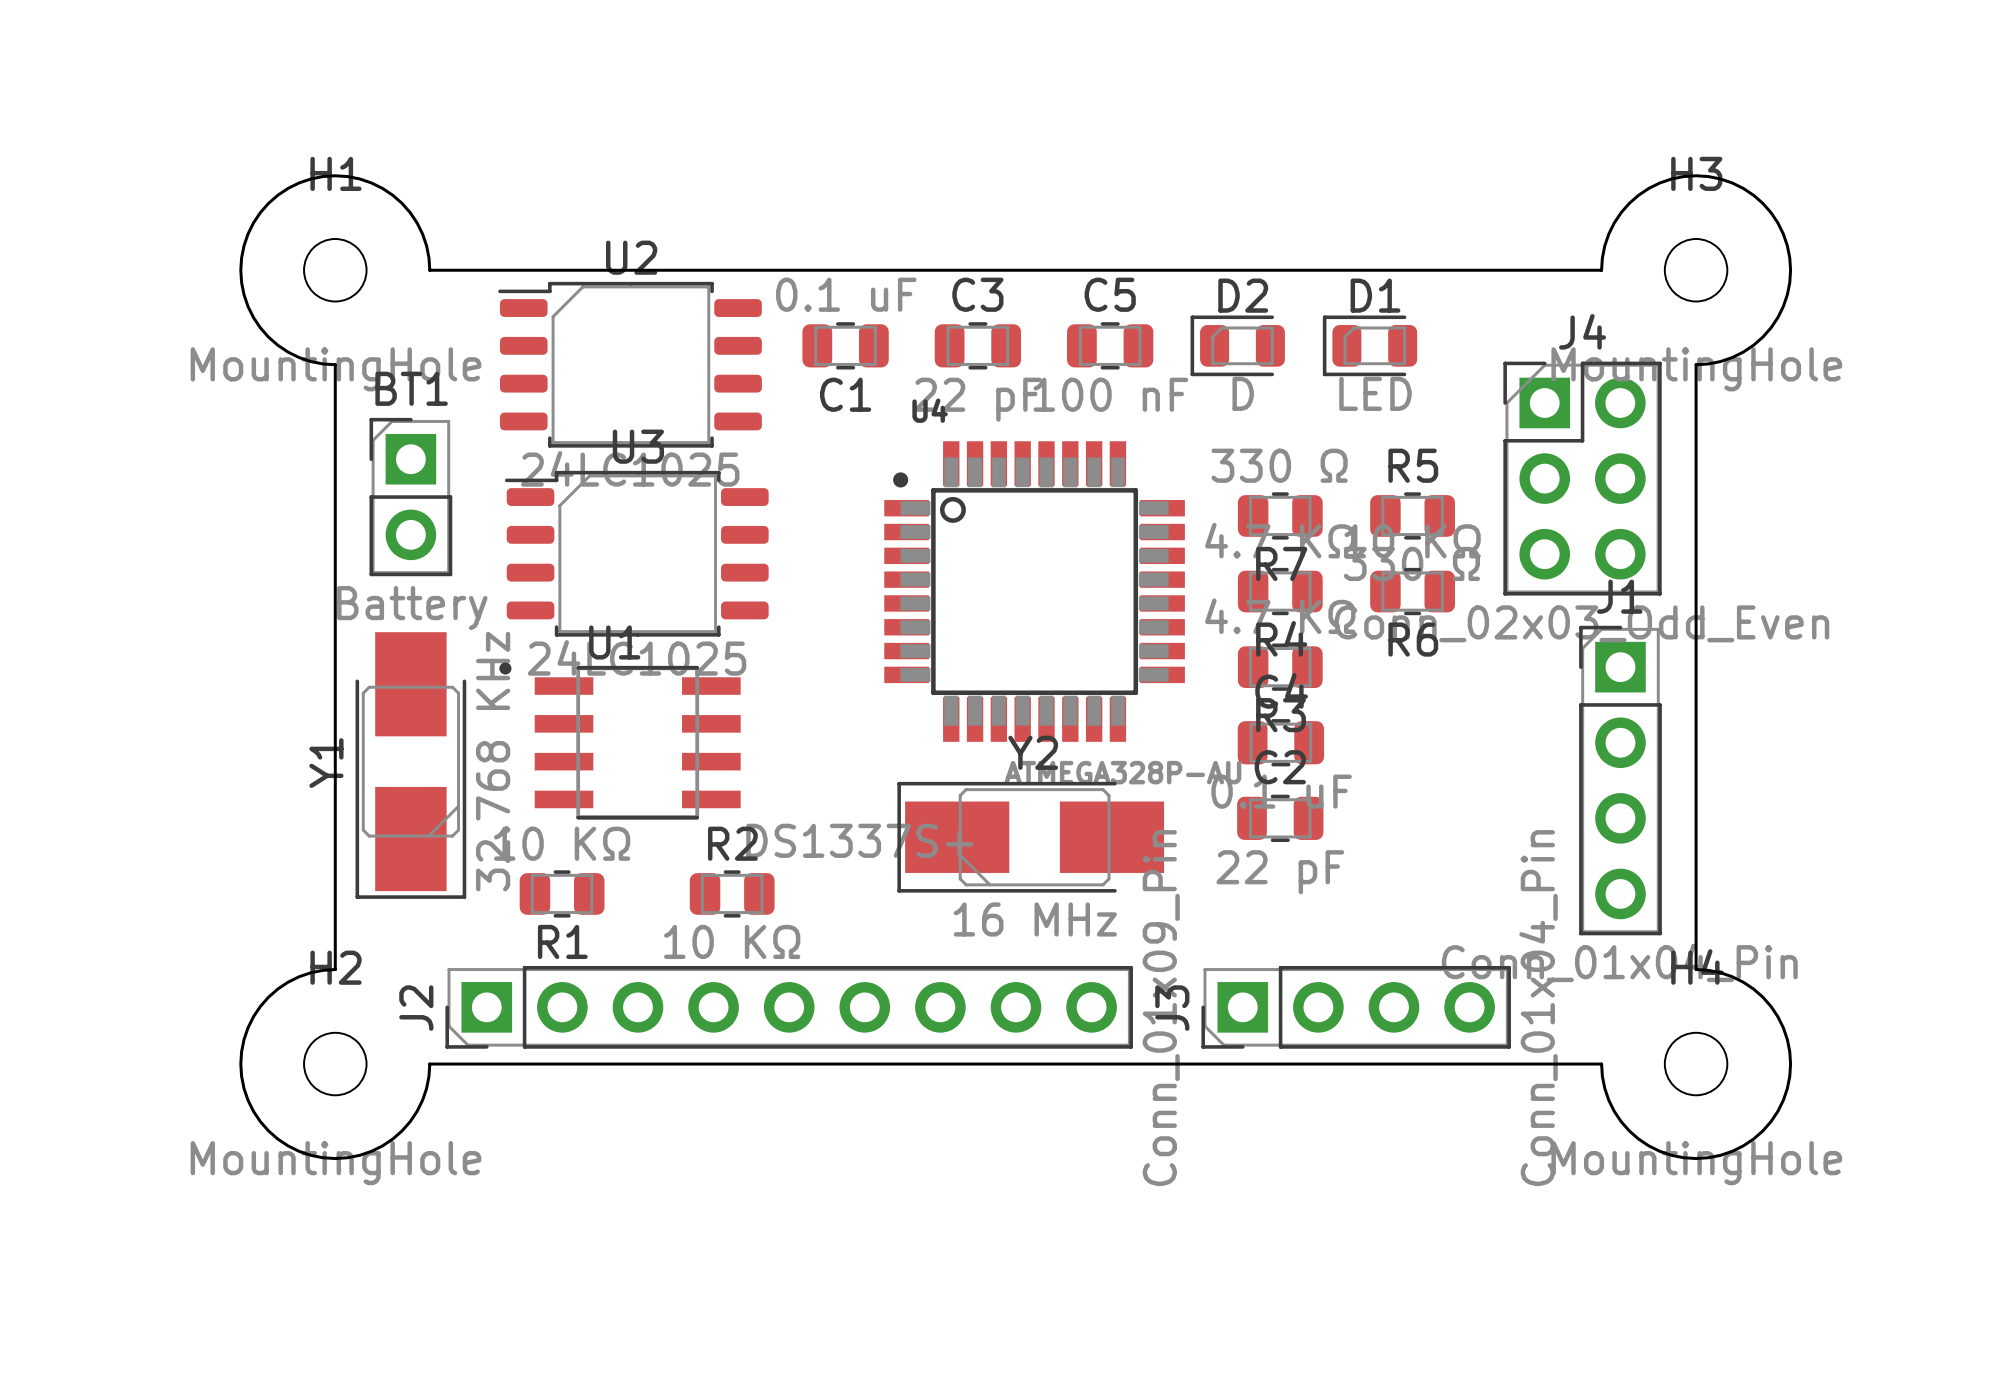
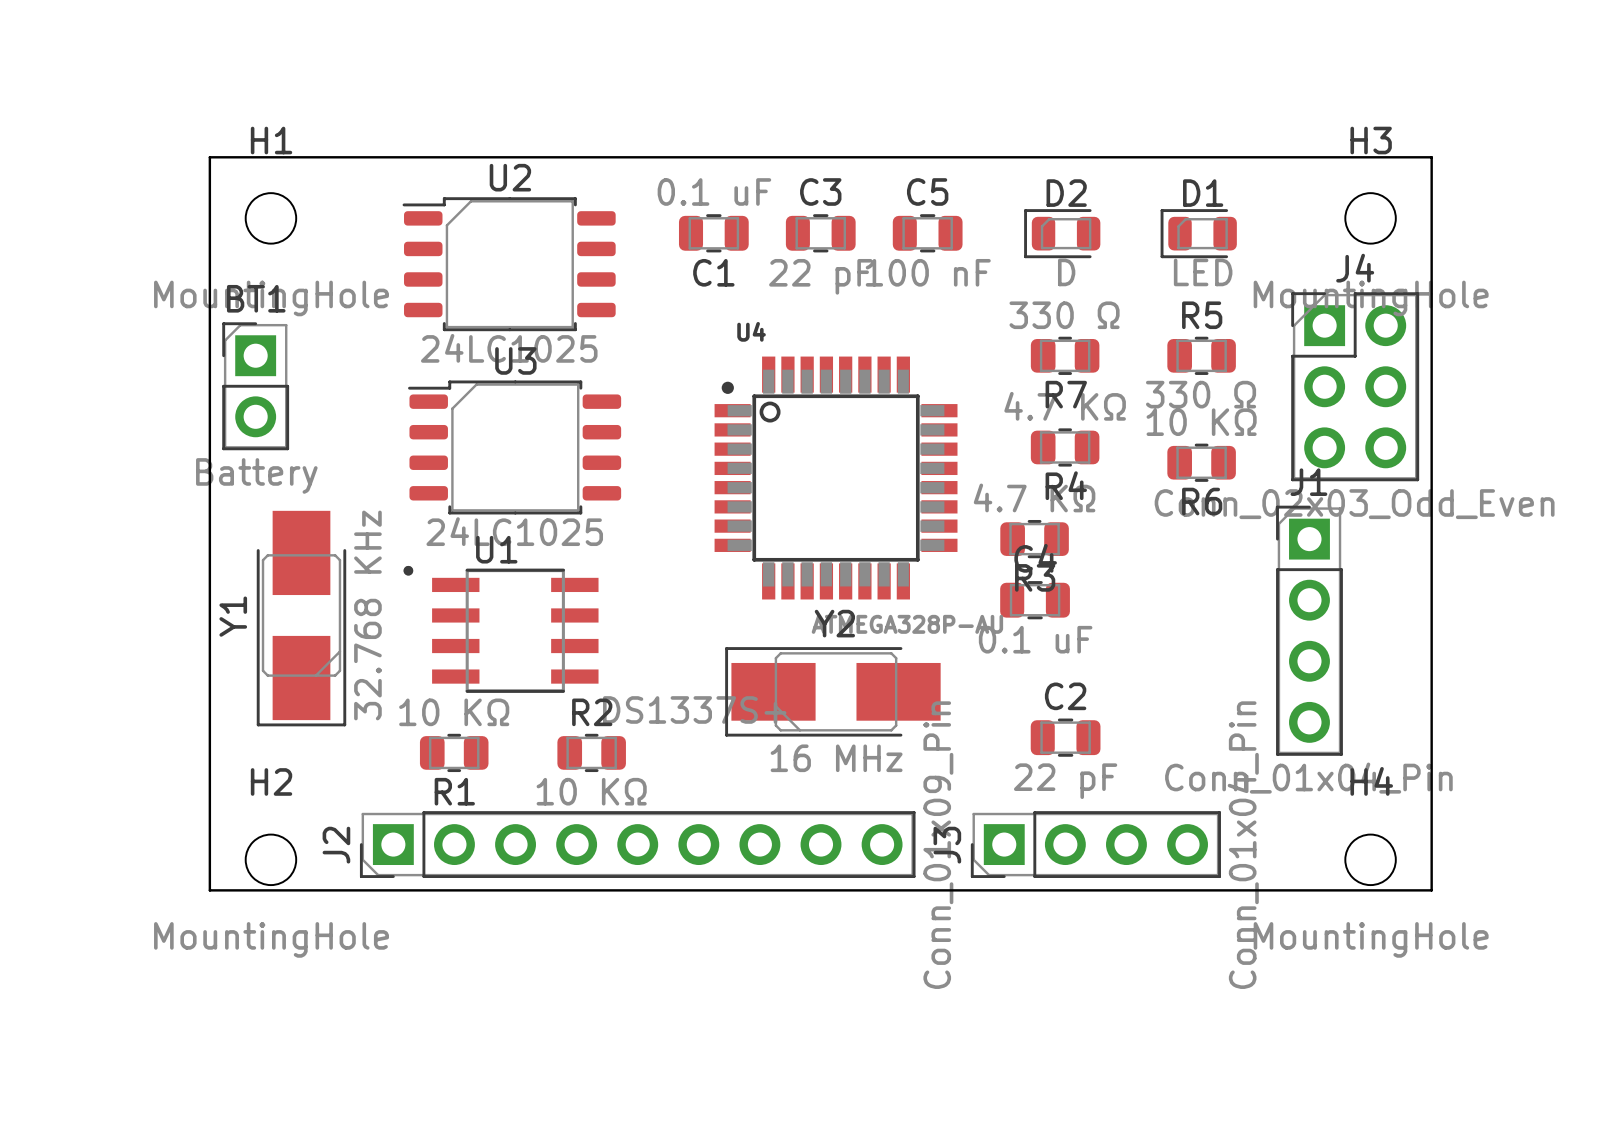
board edge: (429, 270) (1601, 270) (1604, 245) (1614, 223) (1629, 203) (1648, 188) (1671, 178) (1696, 175) (1720, 178) (1743, 188) (1762, 203) (1777, 223) (1787, 245) (1790, 270) (1789, 282) (1783, 306) (1777, 317) (1762, 337) (1743, 352) (1732, 357) (1708, 363) (1696, 364) (1696, 969) (1720, 972) (1743, 982) (1762, 997) (1777, 1016) (1787, 1039) (1790, 1064) (1787, 1088) (1777, 1111) (1762, 1130) (1743, 1145) (1720, 1155) (1696, 1158) (1671, 1155) (1659, 1151) (1638, 1139) (1629, 1130) (1621, 1121) (1608, 1100) (1602, 1076) (1601, 1064) (429, 1064) (426, 1088) (417, 1111) (402, 1130) (382, 1145) (359, 1155) (335, 1158) (310, 1155) (288, 1145) (268, 1130) (253, 1111) (244, 1088) (240, 1064) (244, 1039) (247, 1027) (260, 1006) (268, 997) (277, 989) (299, 976) (322, 970) (335, 969) (335, 364) (310, 361) (288, 352) (277, 345) (260, 327) (247, 306) (244, 294) (241, 282) (241, 257) (247, 234) (253, 223) (268, 203) (288, 188) (299, 182) (322, 176) (335, 175) (359, 178) (371, 182) (392, 195) (402, 203) (410, 212) (422, 234) (426, 245) (429, 270) -> (209, 157) (209, 890) (1431, 890) (1431, 157) (209, 157)
C1 position: (845, 345) -> (713, 233)
C3 position: (977, 345) -> (820, 233)
C5 position: (1110, 345) -> (927, 233)
D2 position: (1237, 345) -> (1062, 233)
D1 position: (1370, 345) -> (1198, 233)
U2 position: (630, 364) -> (509, 264)
J4 position: (1582, 478) -> (1355, 386)
BT1 position: (410, 497) -> (255, 386)
R7 position: (1280, 515) -> (1065, 355)
R5 position: (1412, 515) -> (1201, 355)
R4 position: (1280, 591) -> (1065, 447)
R6 position: (1412, 591) -> (1201, 462)
U1 position: (620, 741) -> (501, 629)
Y1 position: (410, 765) -> (301, 618)
C2 position: (1280, 818) -> (1065, 737)
Y2 position: (1030, 837) -> (832, 691)
R1 position: (562, 893) -> (454, 752)
R2 position: (732, 893) -> (591, 752)
J2 position: (789, 1007) -> (637, 844)
J3 position: (1356, 1007) -> (1095, 844)

